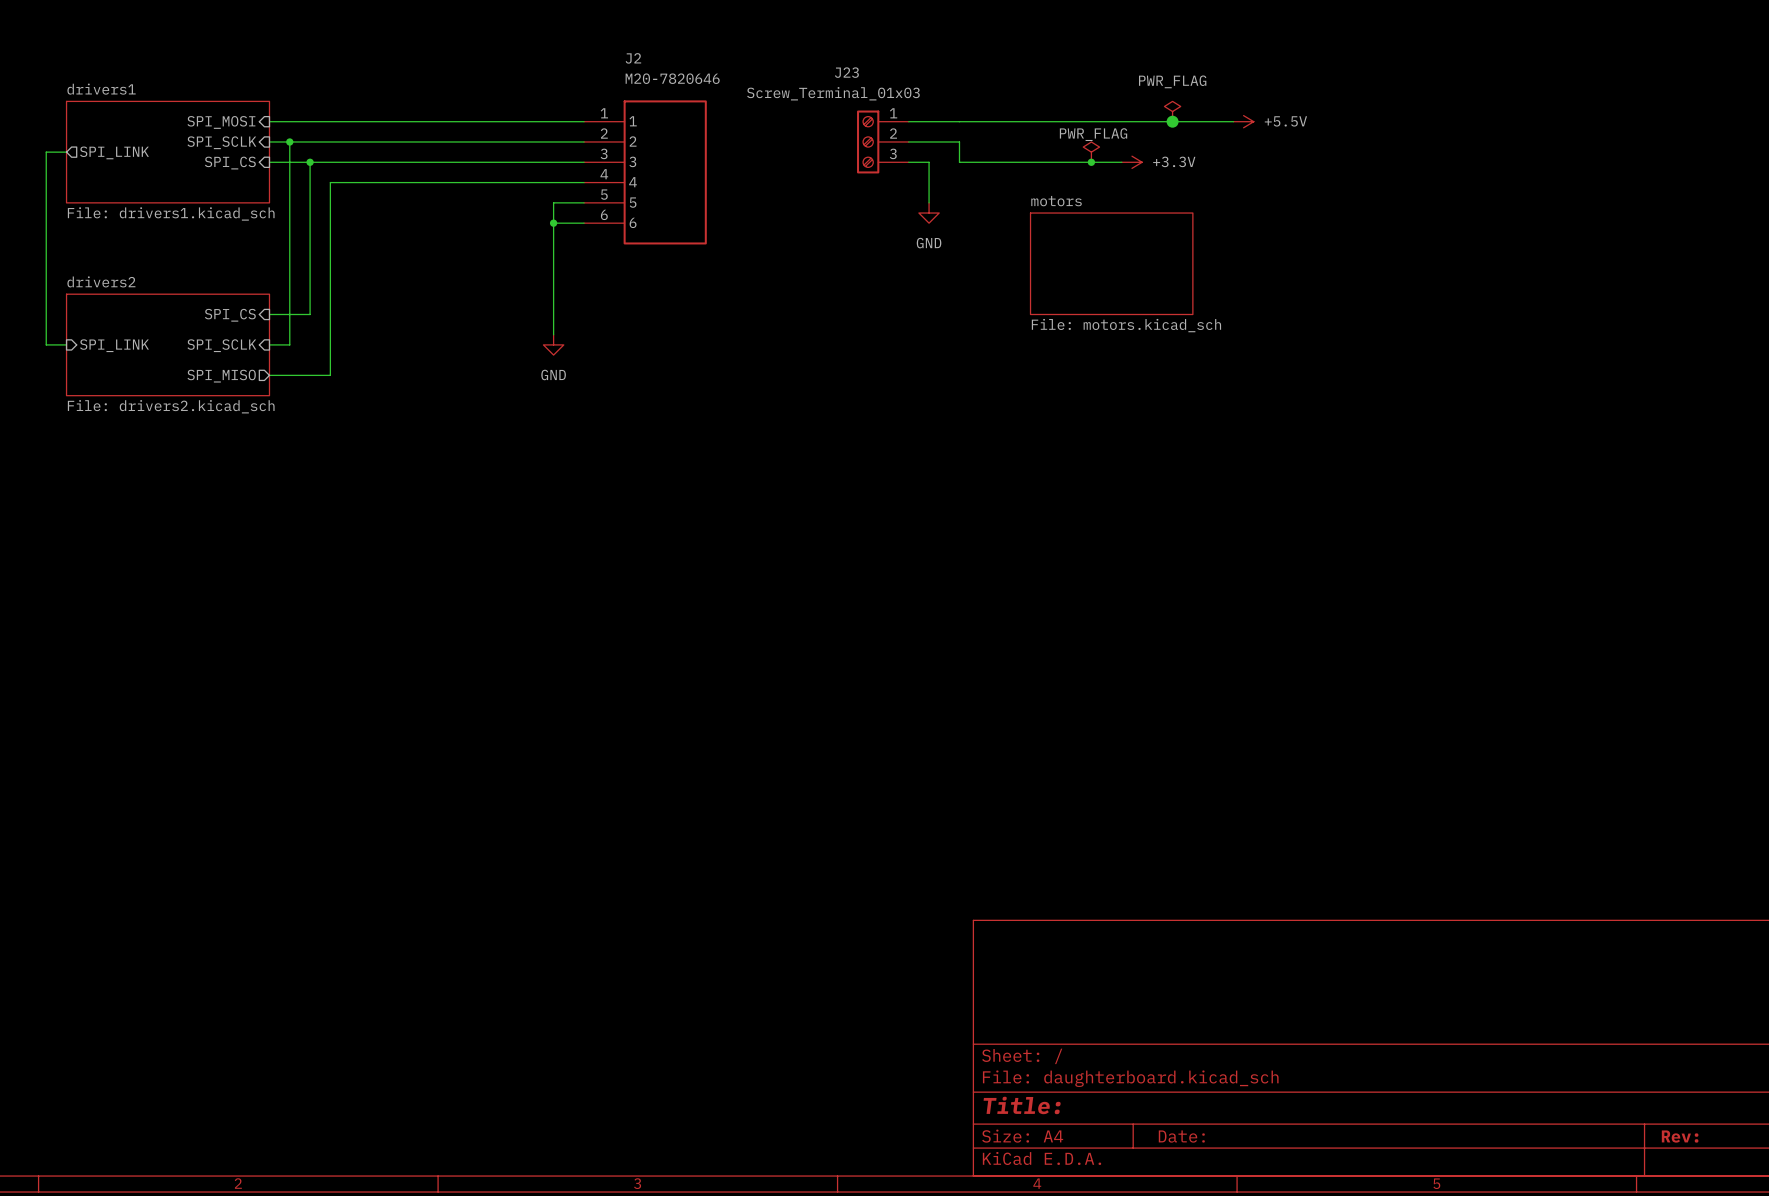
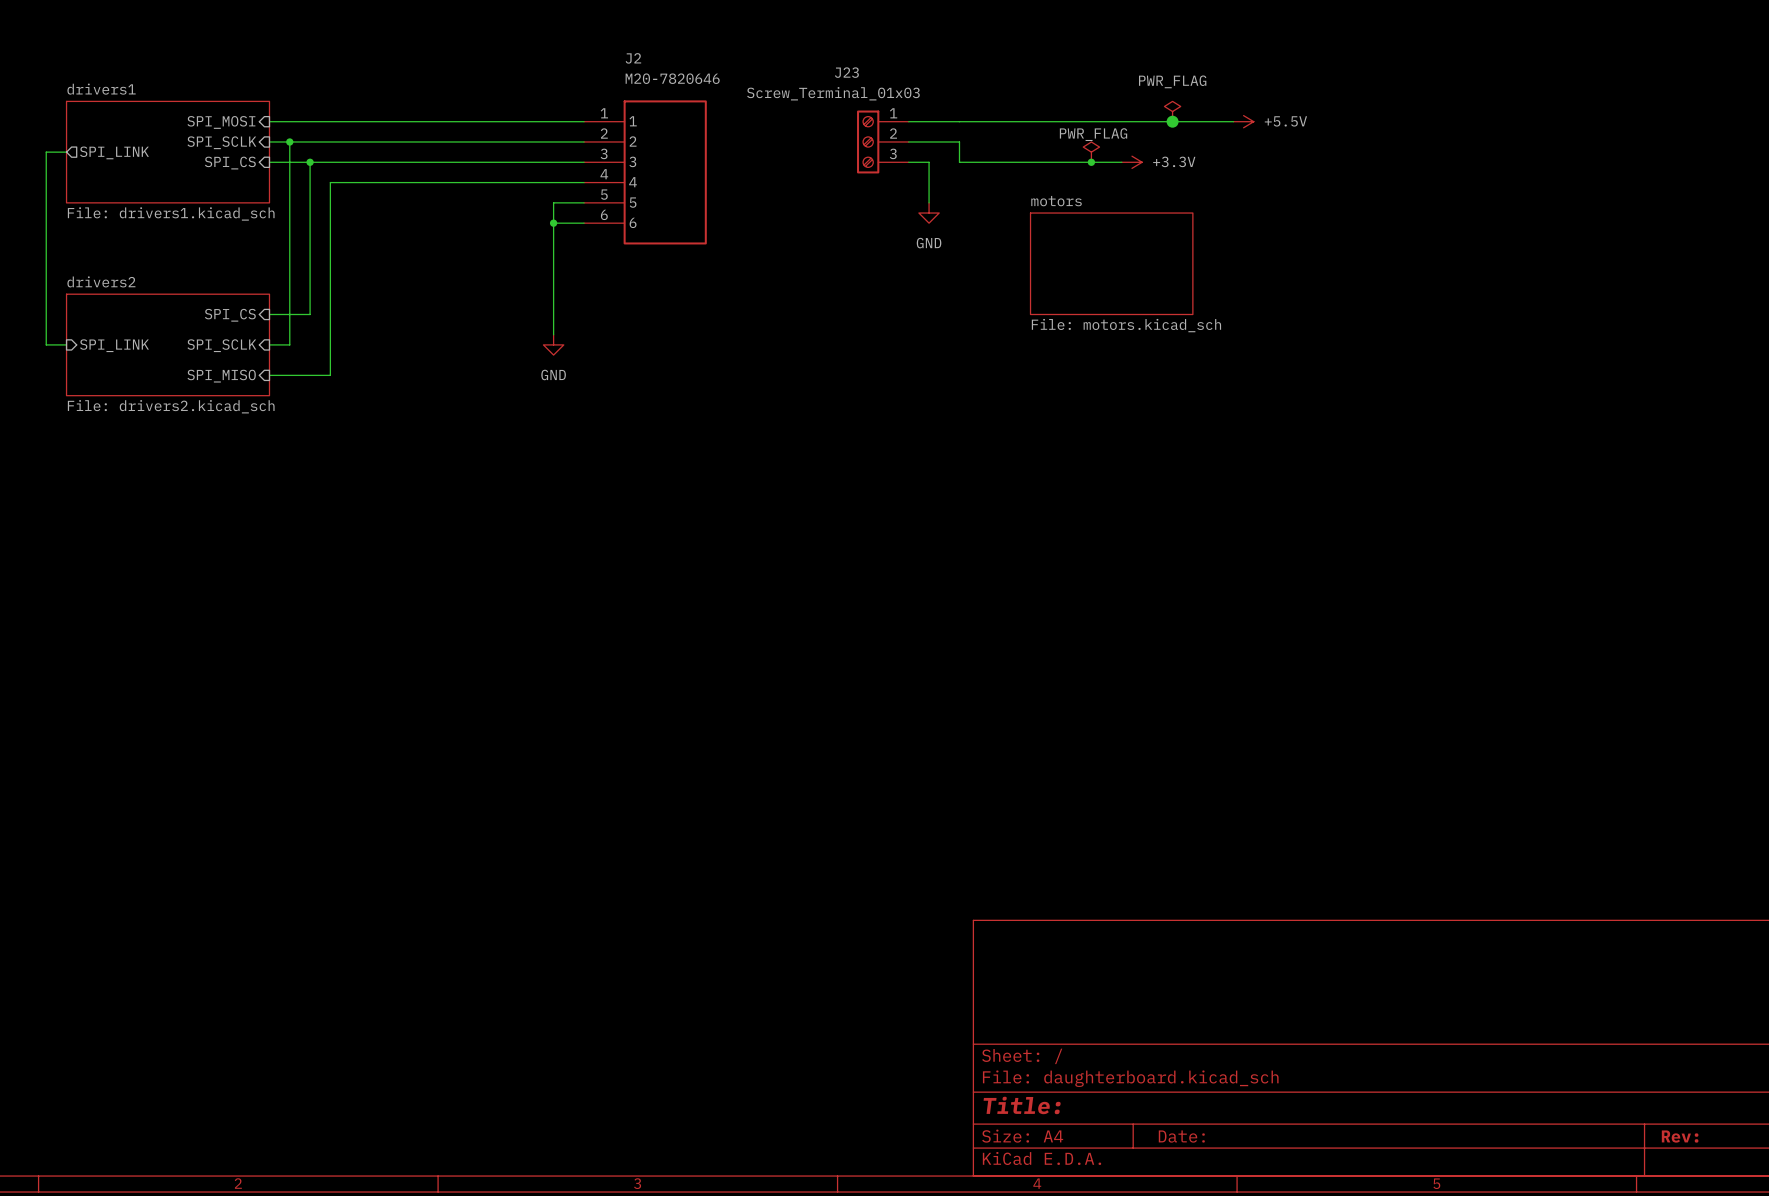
sheet pin shape: output (221, 376) -> input (221, 376)

